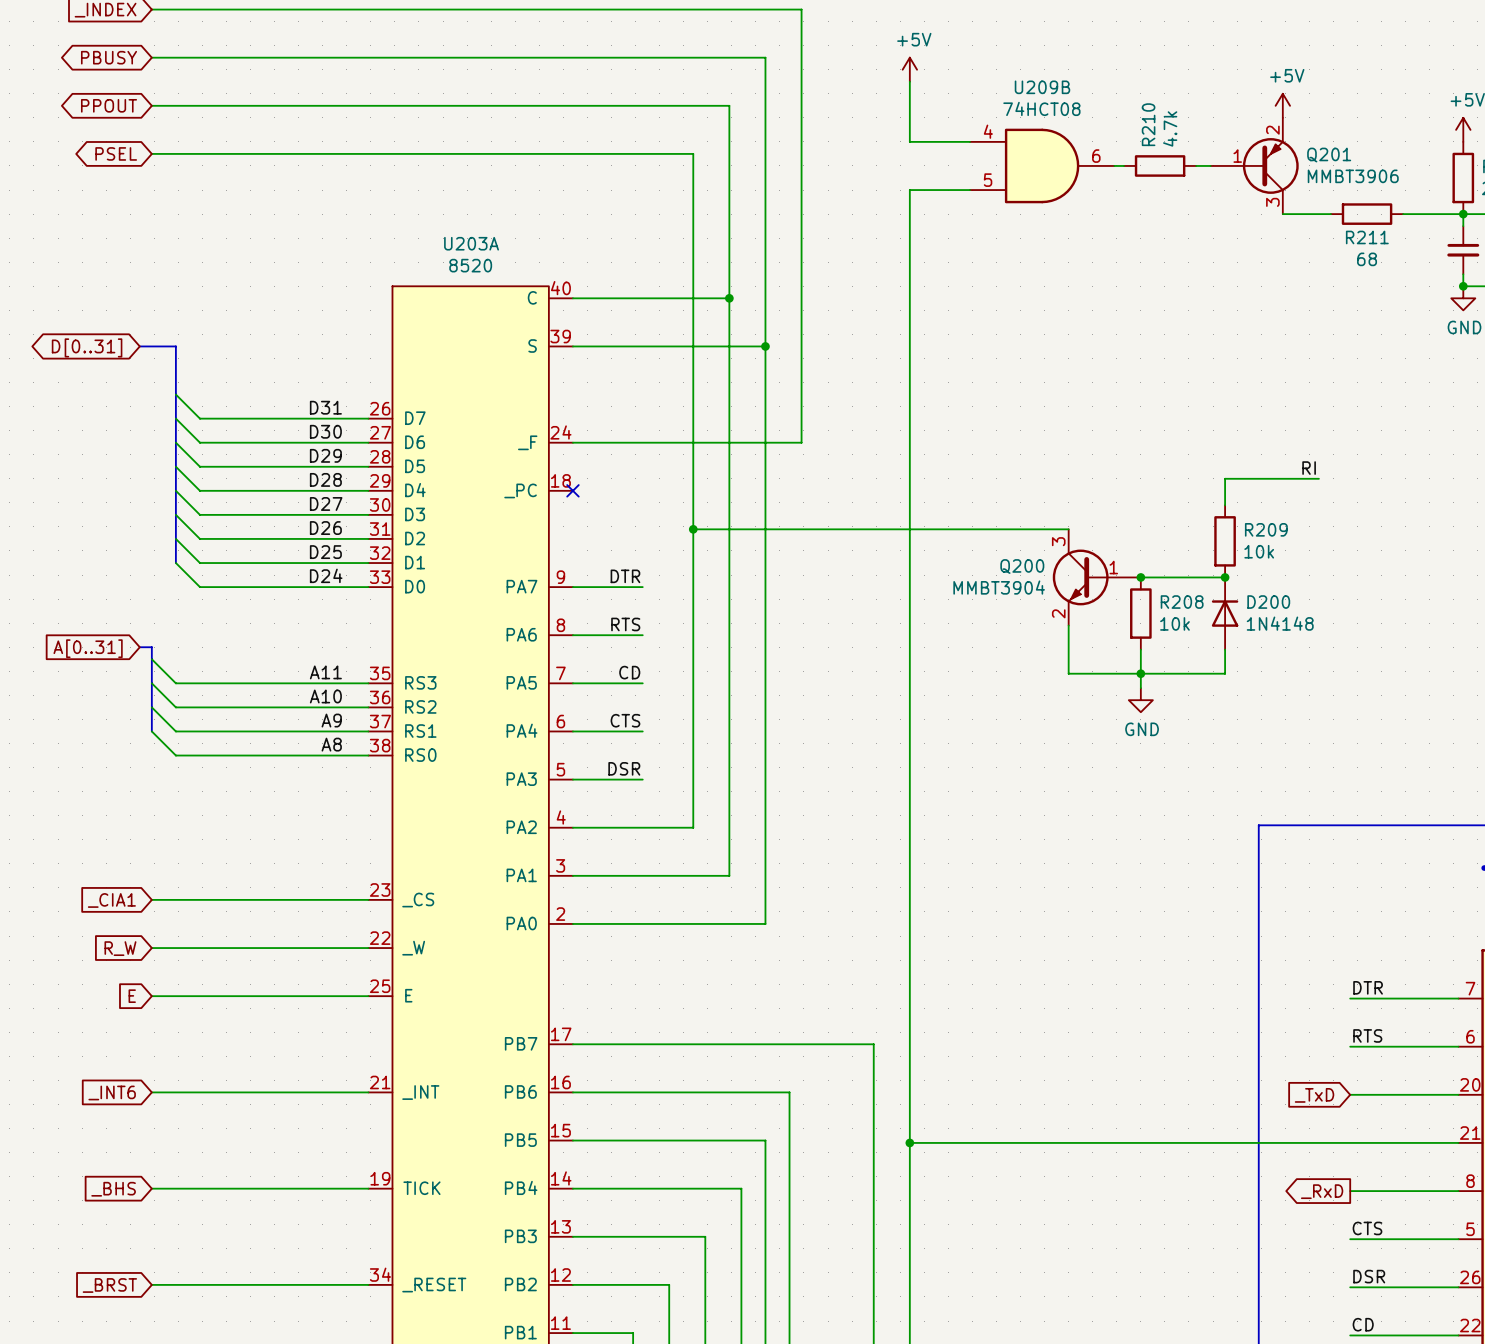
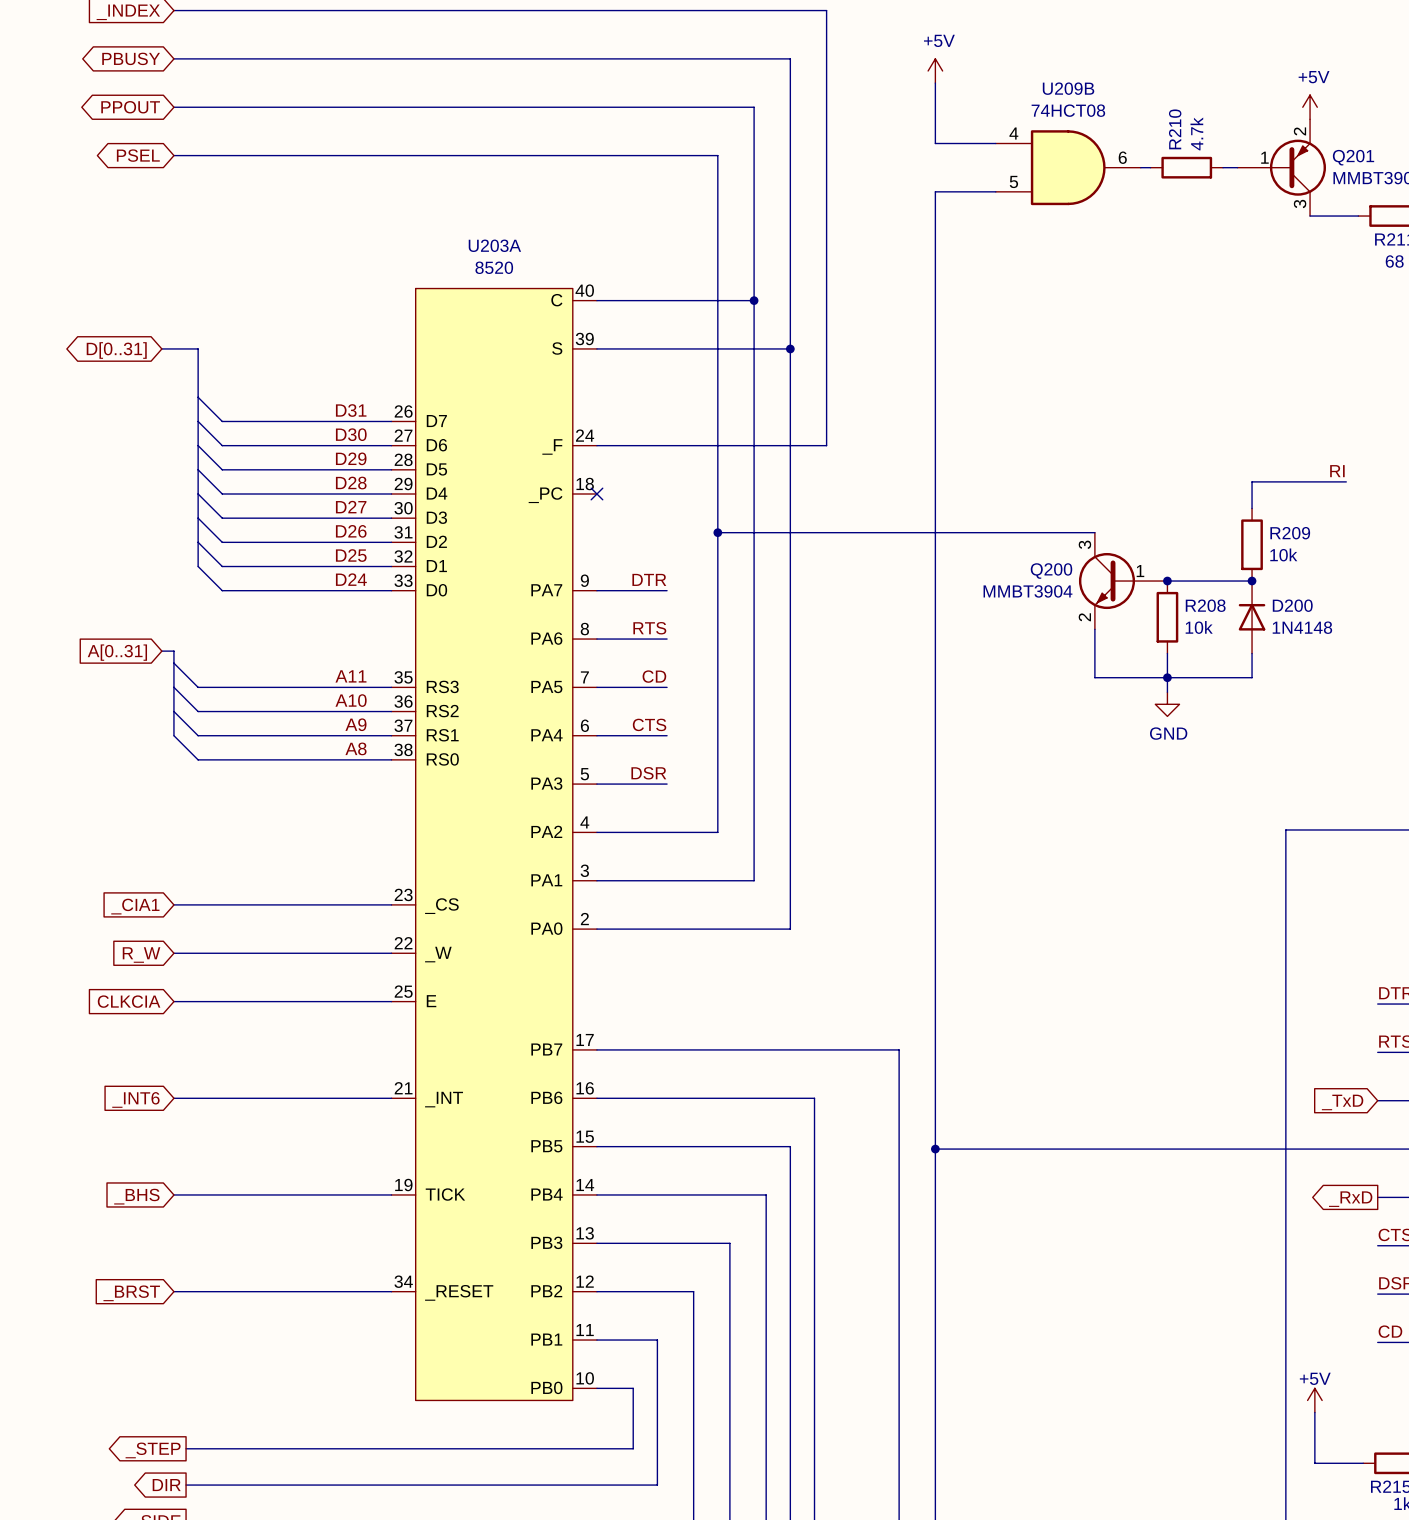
global label: E (132, 996) -> CLKCIA (129, 1001)

